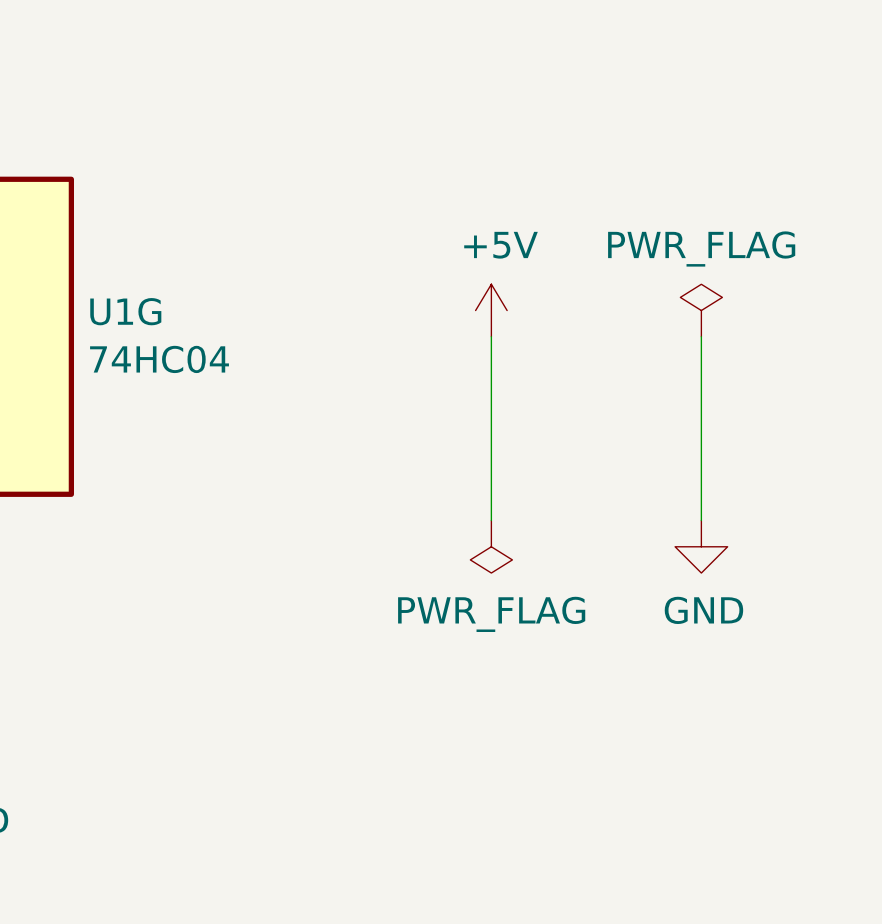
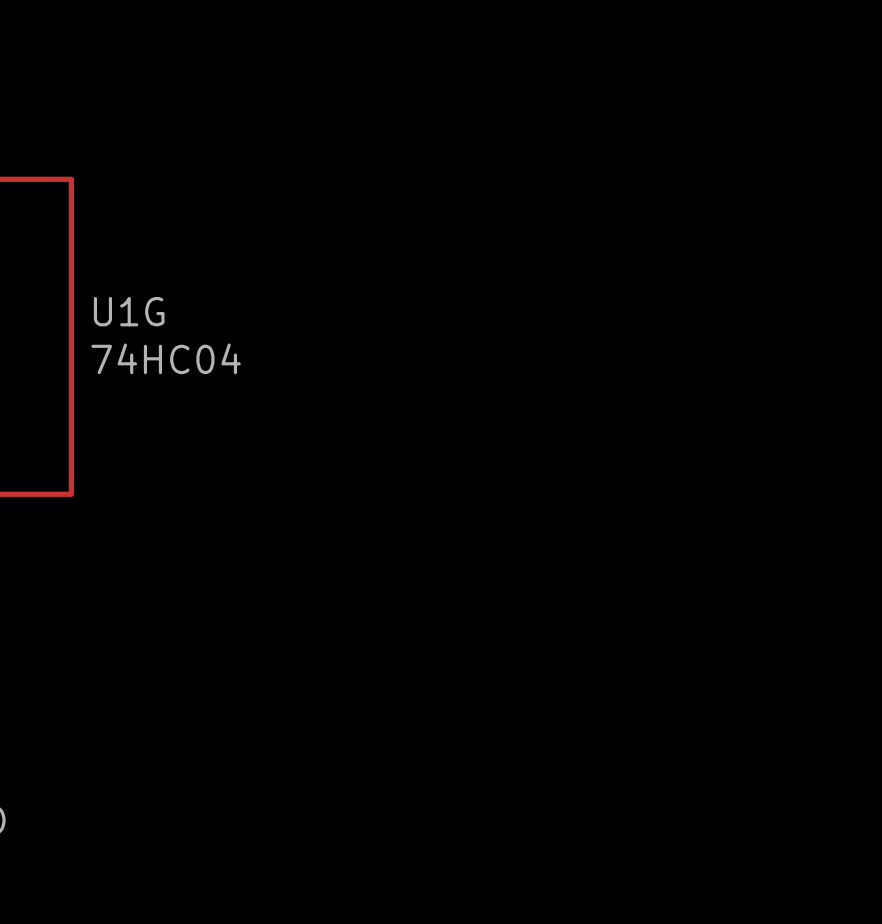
power symbol: +5V (491, 310) -> none
power symbol: PWR_FLAG (701, 310) -> none
wire: (491, 336) (491, 520) -> none
wire: (701, 336) (701, 520) -> none
power symbol: PWR_FLAG (491, 546) -> none
power symbol: GND (701, 546) -> none

